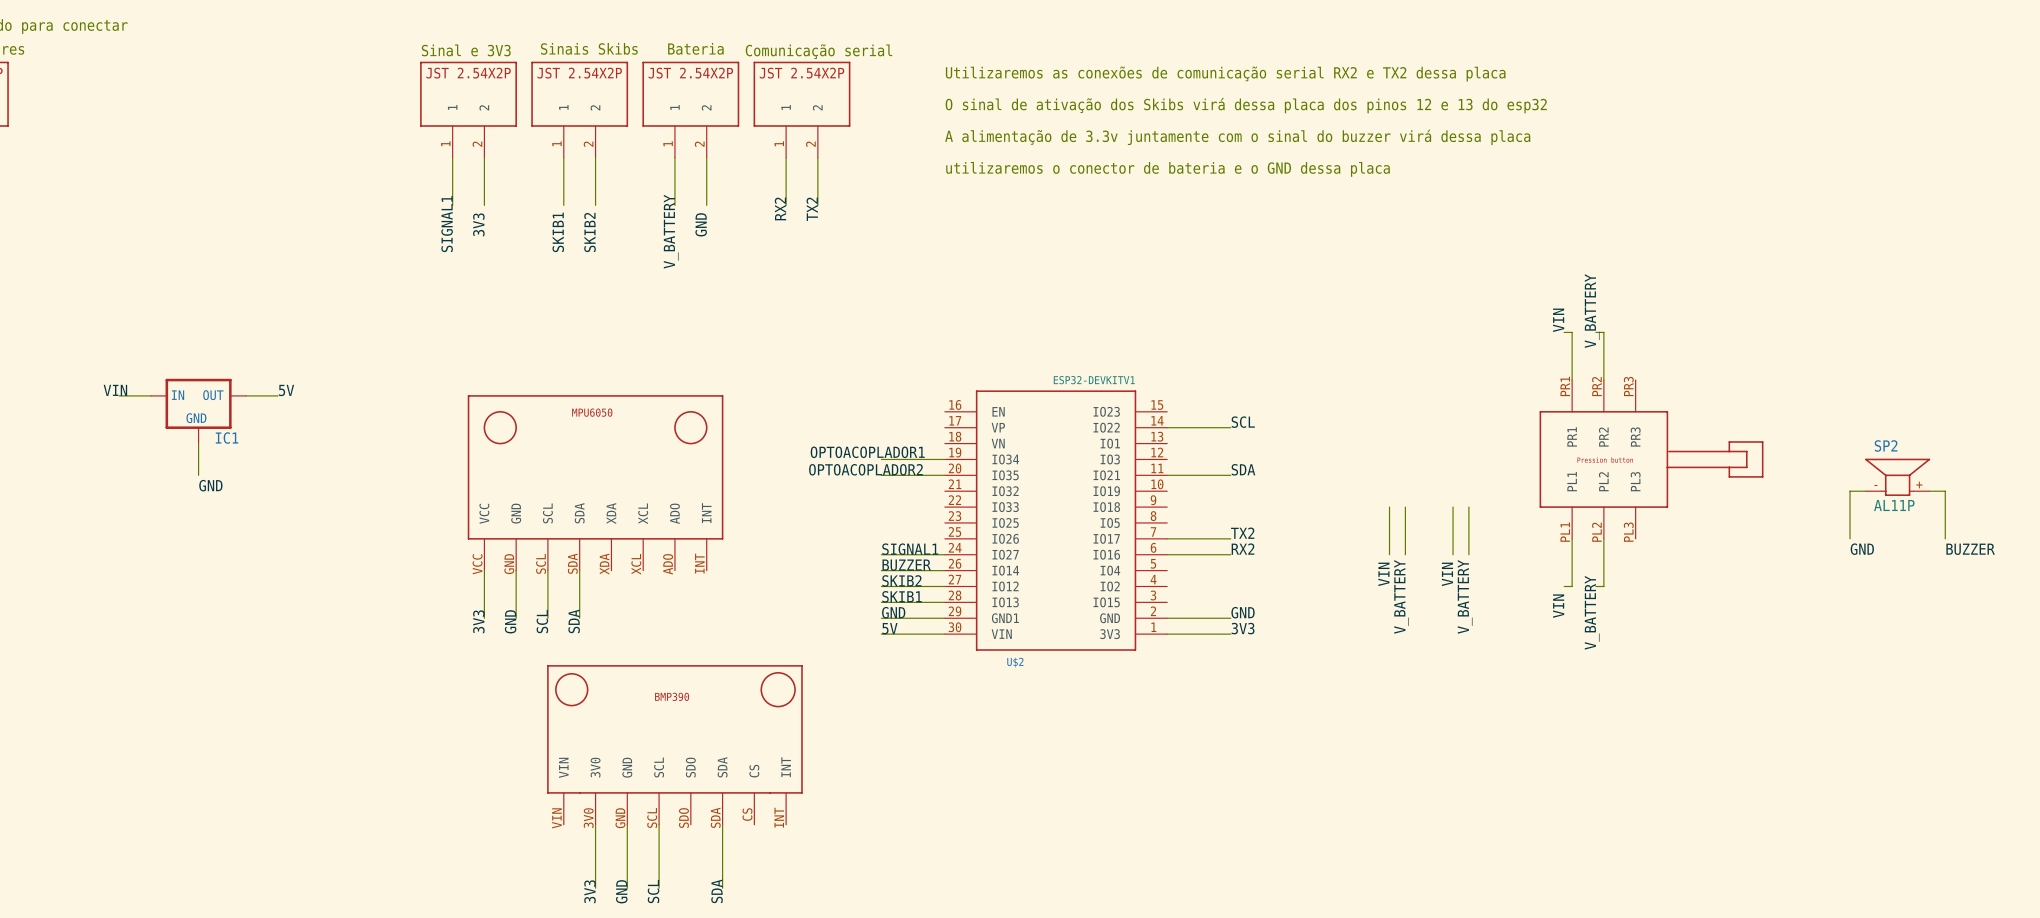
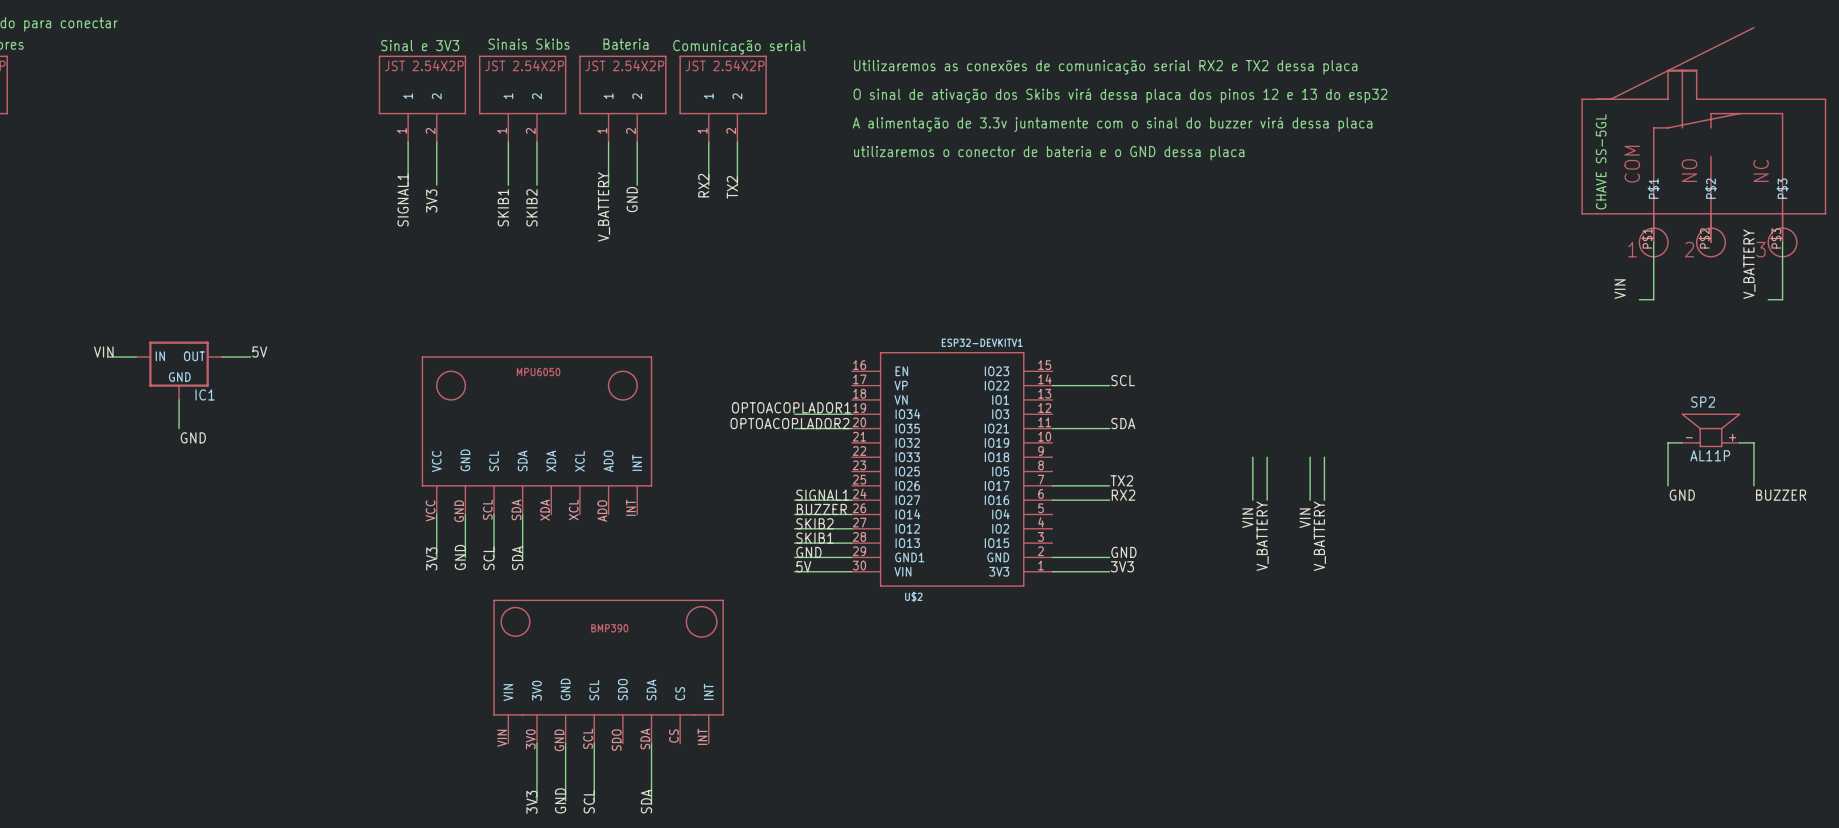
part: none -> (1703, 142)
wire: none -> (1653, 242) (1653, 299) (1639, 299)
wire: none -> (1782, 242) (1782, 299) (1768, 299)
label: none -> V_BATTERY (1749, 264)
label: V_BATTERY (1592, 311) -> none
label: VIN (1558, 320) -> none
label: none -> VIN (1620, 289)
wire: (1564, 332) (1572, 332) (1572, 380) -> none
wire: (1595, 332) (1603, 332) (1603, 380) -> none
part: (1651, 459) -> none
wire: (1572, 538) (1572, 586) (1564, 586) -> none
wire: (1603, 538) (1603, 586) (1595, 586) -> none
label: VIN (1558, 606) -> none
label: V_BATTERY (1592, 612) -> none

